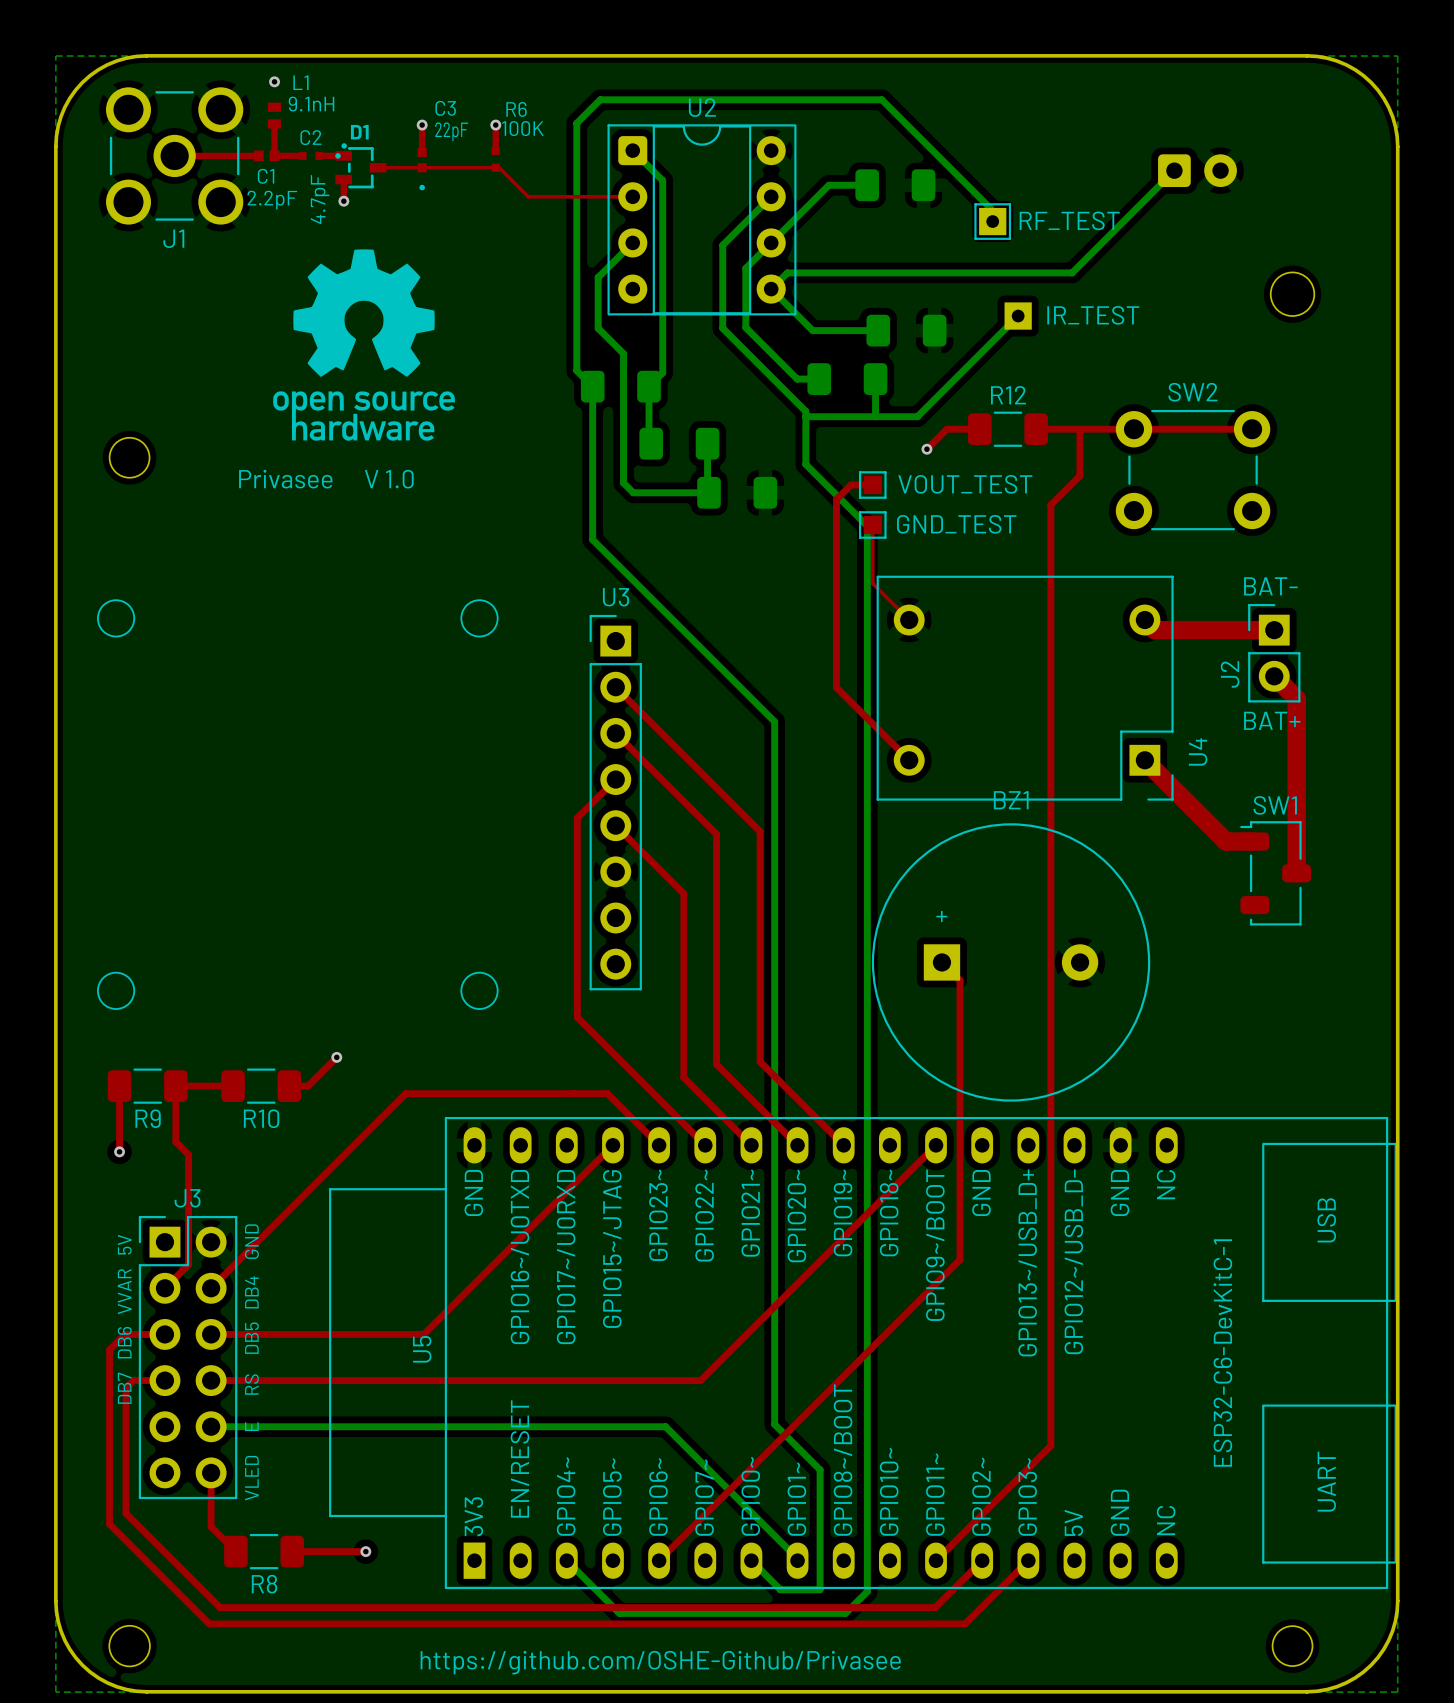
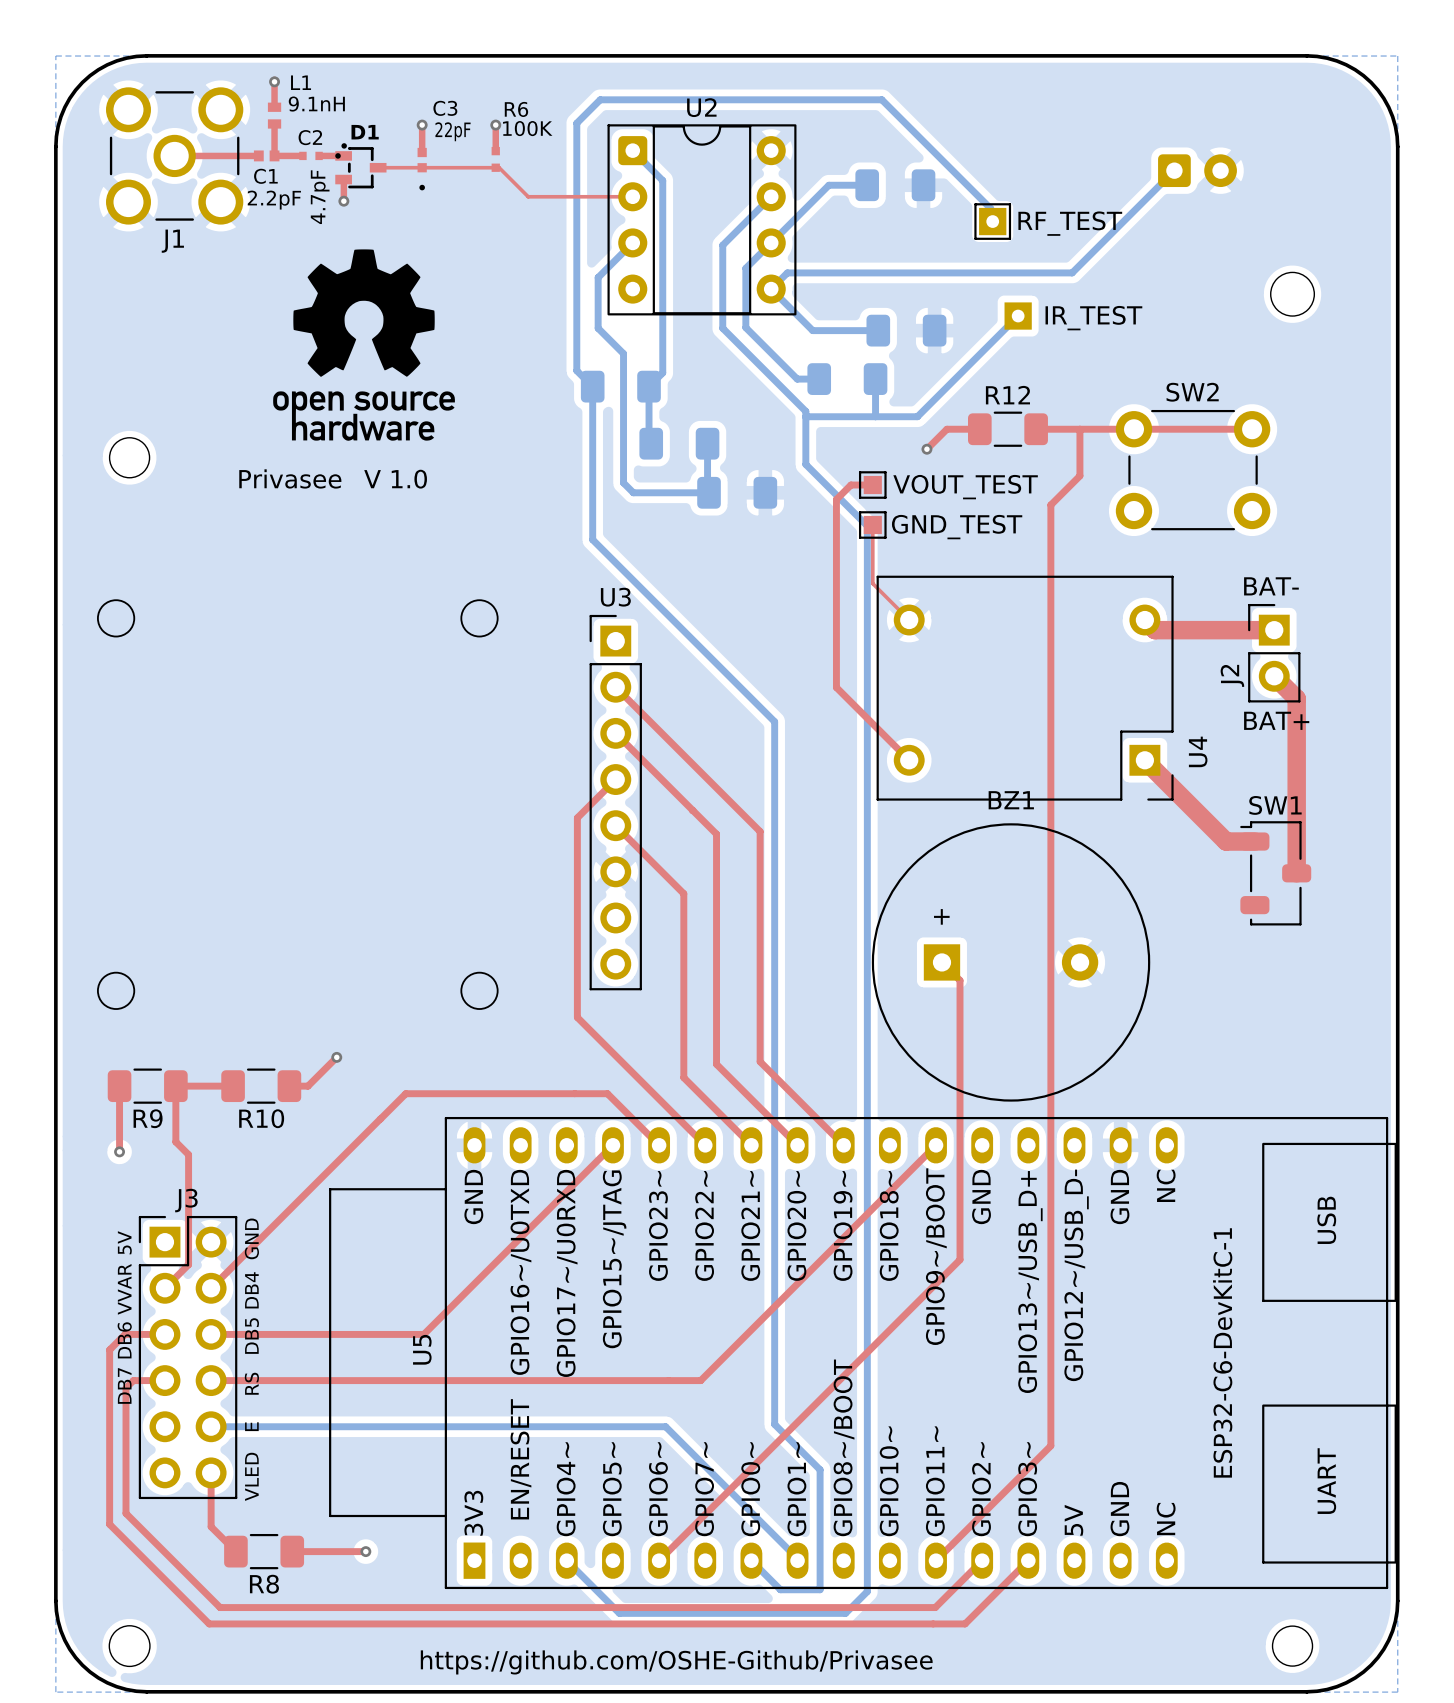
top track: none -> (274, 79) (274, 107)

